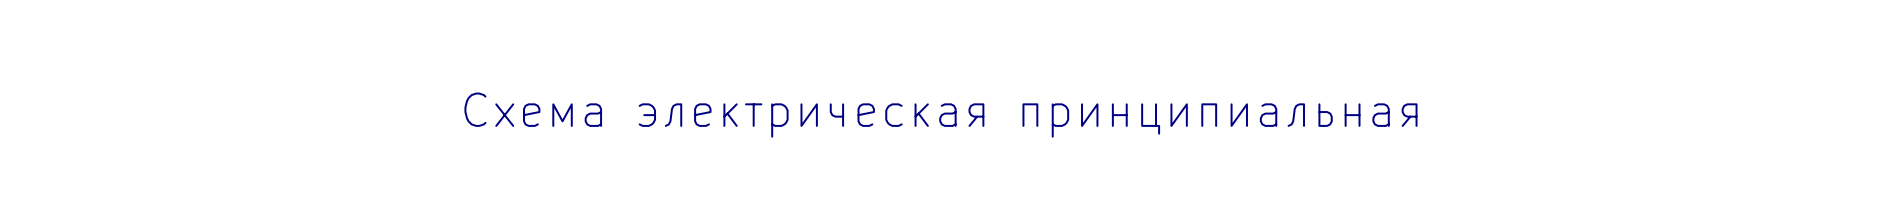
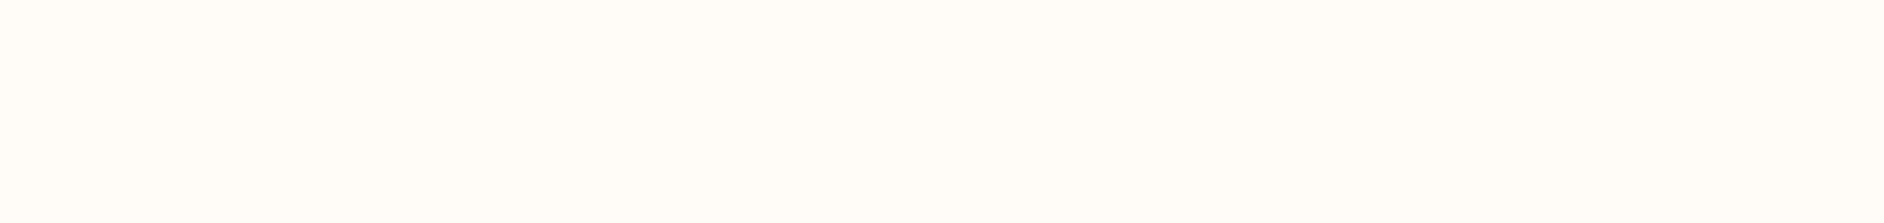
text: Схема электрическая принципиальная (940, 115) -> none

